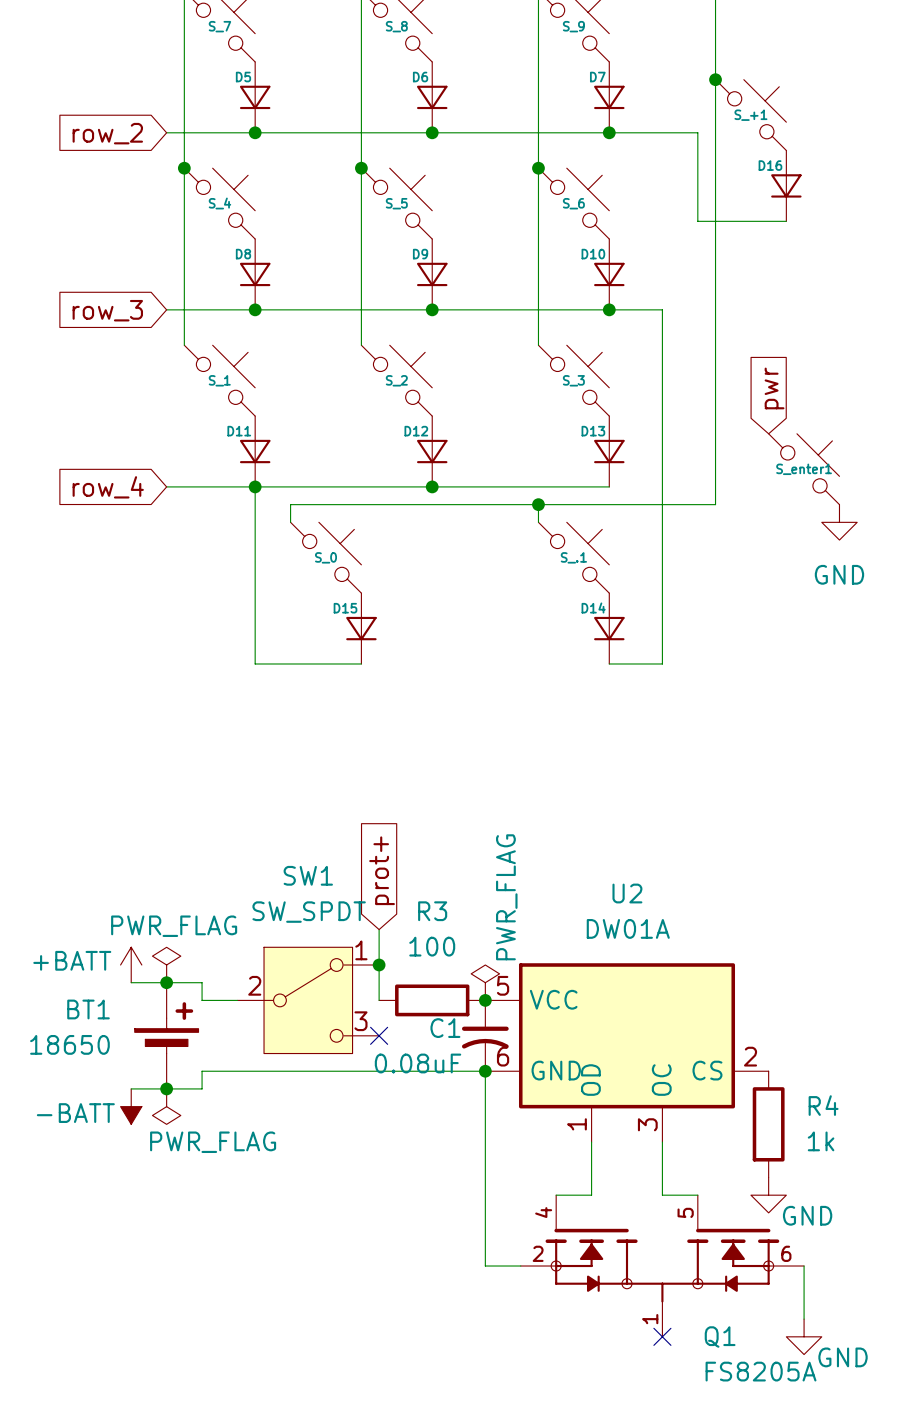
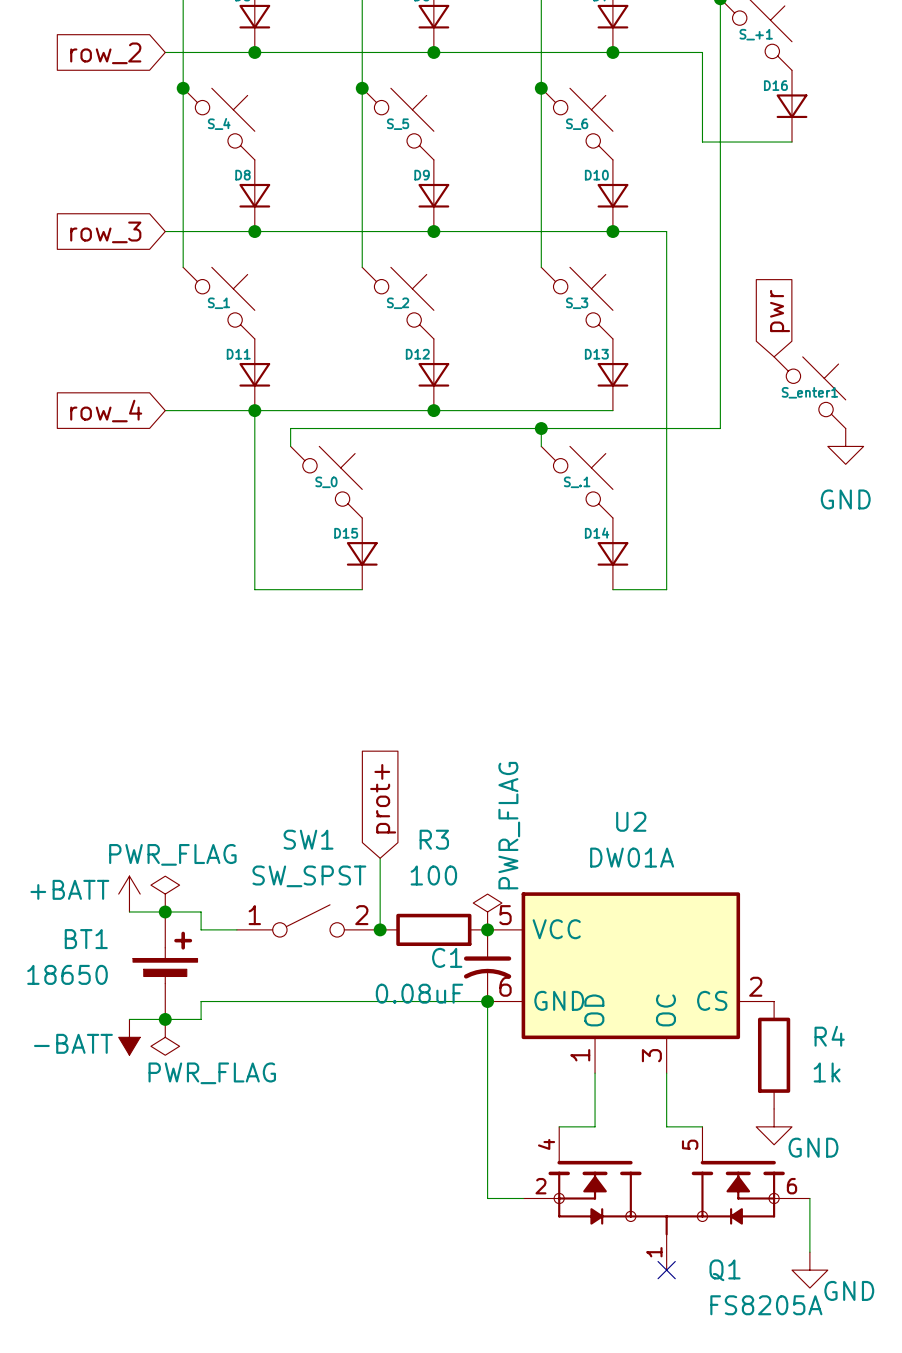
SW1 name position: SW1 (308, 875) -> SW1 (308, 839)
SW1 value: SW_SPDT (309, 912) -> SW_SPST (309, 876)
SW1 symbol: [237, 947, 380, 1054] -> [236, 904, 381, 938]
junction position: (379, 965) -> (380, 929)
no-connect mark: (379, 1035) -> none

